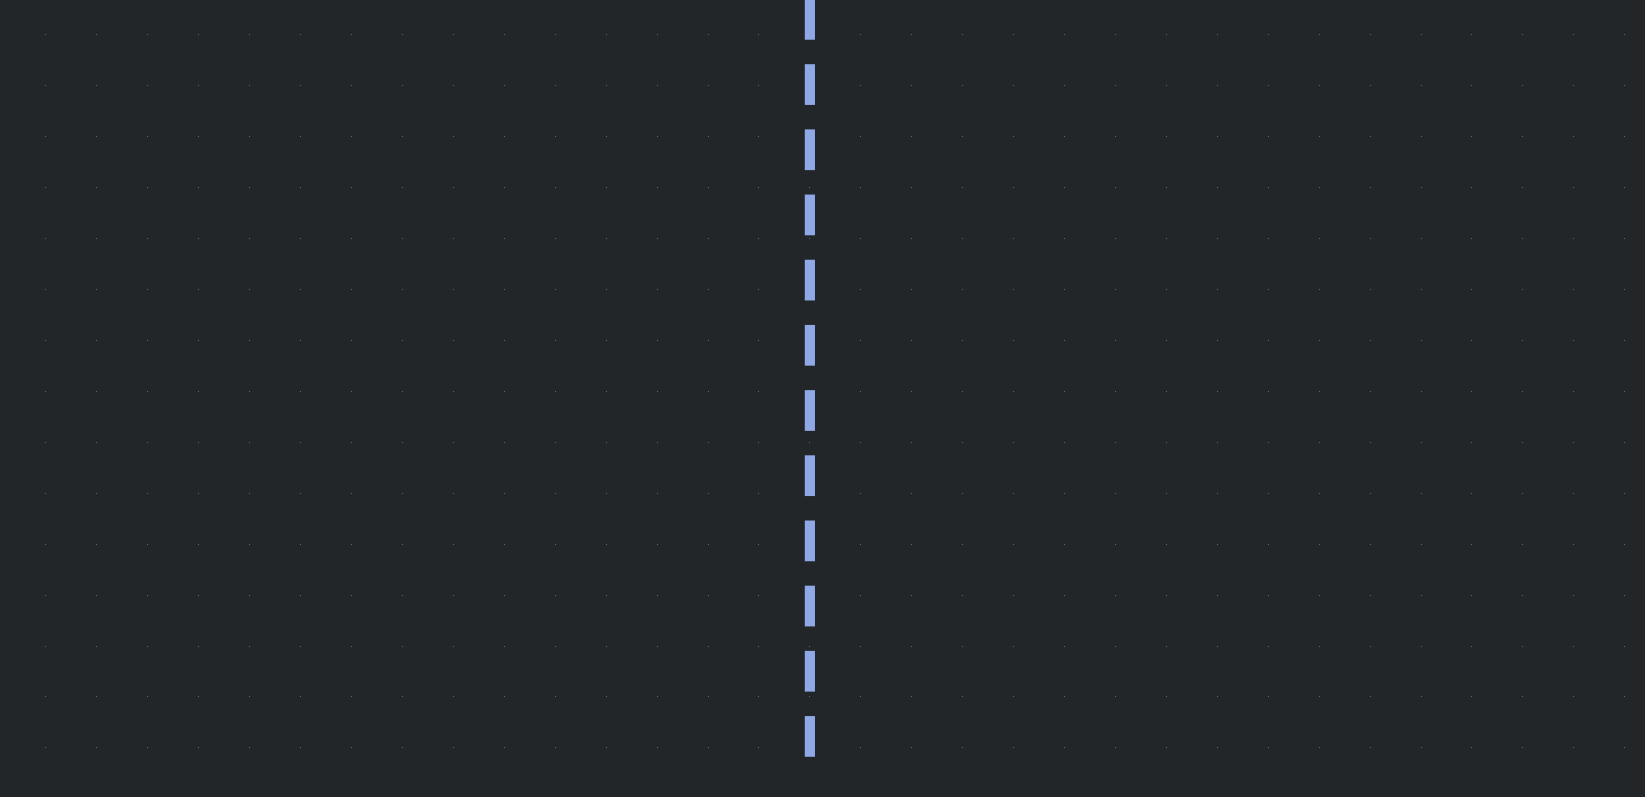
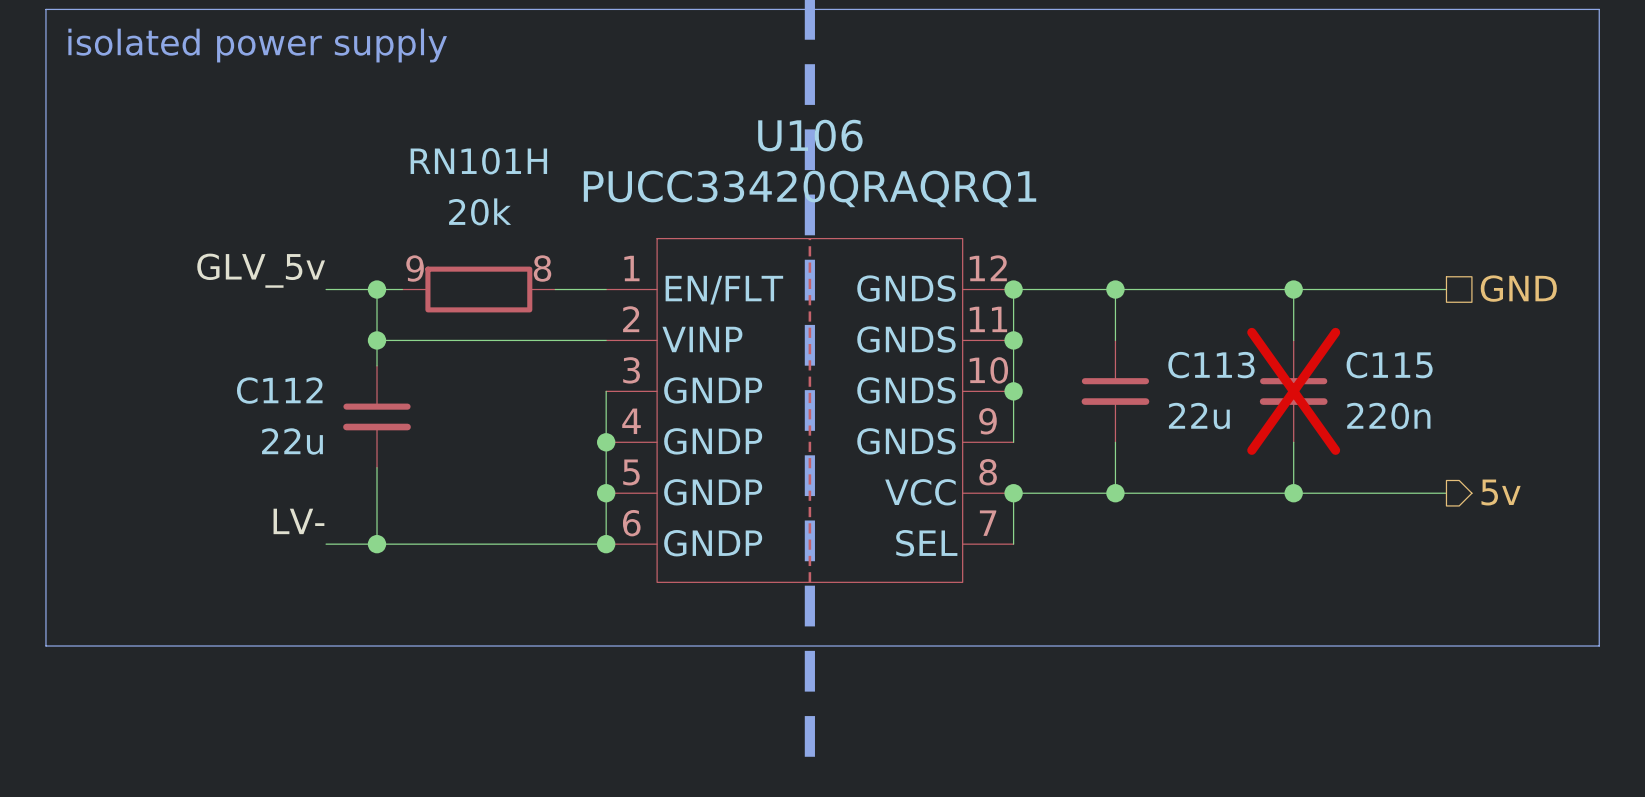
line: none -> (45, 9) (1599, 9) (1599, 646) (45, 646) (45, 9)
text: none -> isolated power supply (257, 45)
label: none -> GLV_5v (261, 270)
hierarchical label: none -> GND (1518, 288)
wire: none -> (326, 289) (402, 289)
wire: none -> (377, 289) (377, 365)
junction: none -> (377, 289)
RN101H: none -> 20k (478, 289)
wire: none -> (555, 289) (606, 289)
junction: none -> (1013, 289)
wire: none -> (1115, 289) (1115, 340)
junction: none -> (1115, 289)
wire: none -> (1293, 289) (1293, 340)
junction: none -> (1293, 289)
wire: none -> (1446, 289) (1013, 289) (1013, 442)
wire: none -> (377, 340) (606, 340)
junction: none -> (377, 340)
junction: none -> (1013, 340)
wire: none -> (606, 391) (606, 544) (326, 544)
junction: none -> (1013, 391)
C113: none -> 22u (1115, 391)
C115: none -> 220n (1293, 391)
U106: none -> PUCC33420QRAQRQ1 (809, 410)
C112: none -> 22u (377, 416)
junction: none -> (606, 442)
wire: none -> (1115, 442) (1115, 493)
wire: none -> (1293, 442) (1293, 493)
wire: none -> (377, 467) (377, 544)
hierarchical label: none -> 5v (1501, 492)
junction: none -> (606, 493)
junction: none -> (1013, 493)
junction: none -> (1115, 493)
junction: none -> (1293, 493)
wire: none -> (1446, 493) (1013, 493) (1013, 544)
label: none -> LV- (298, 521)
junction: none -> (377, 544)
junction: none -> (606, 544)

